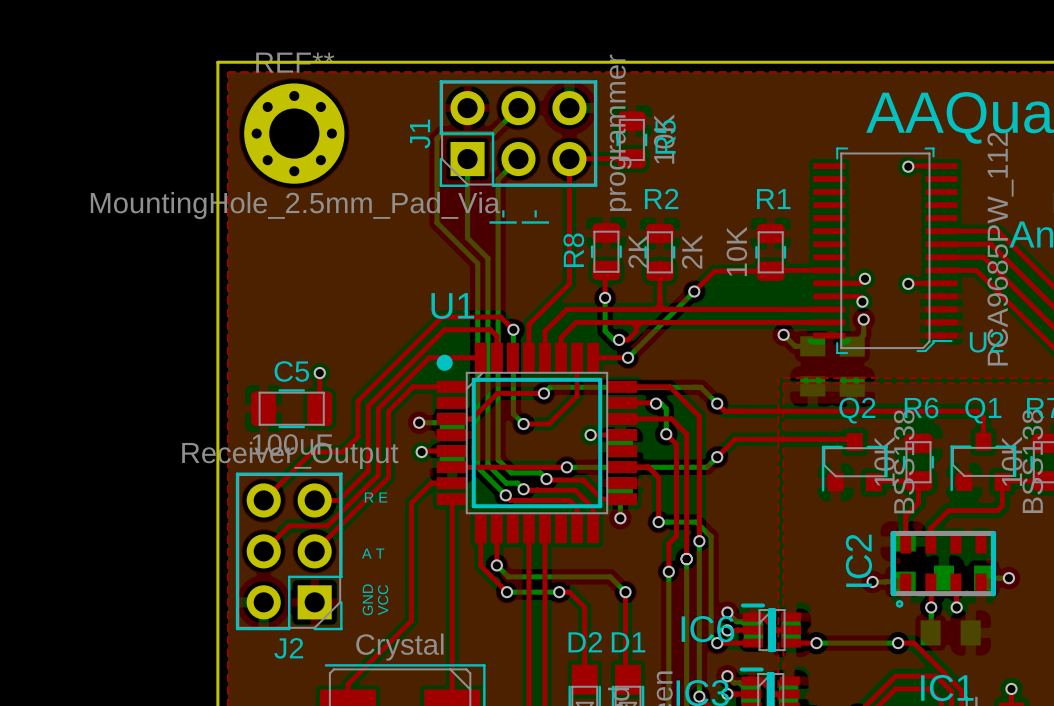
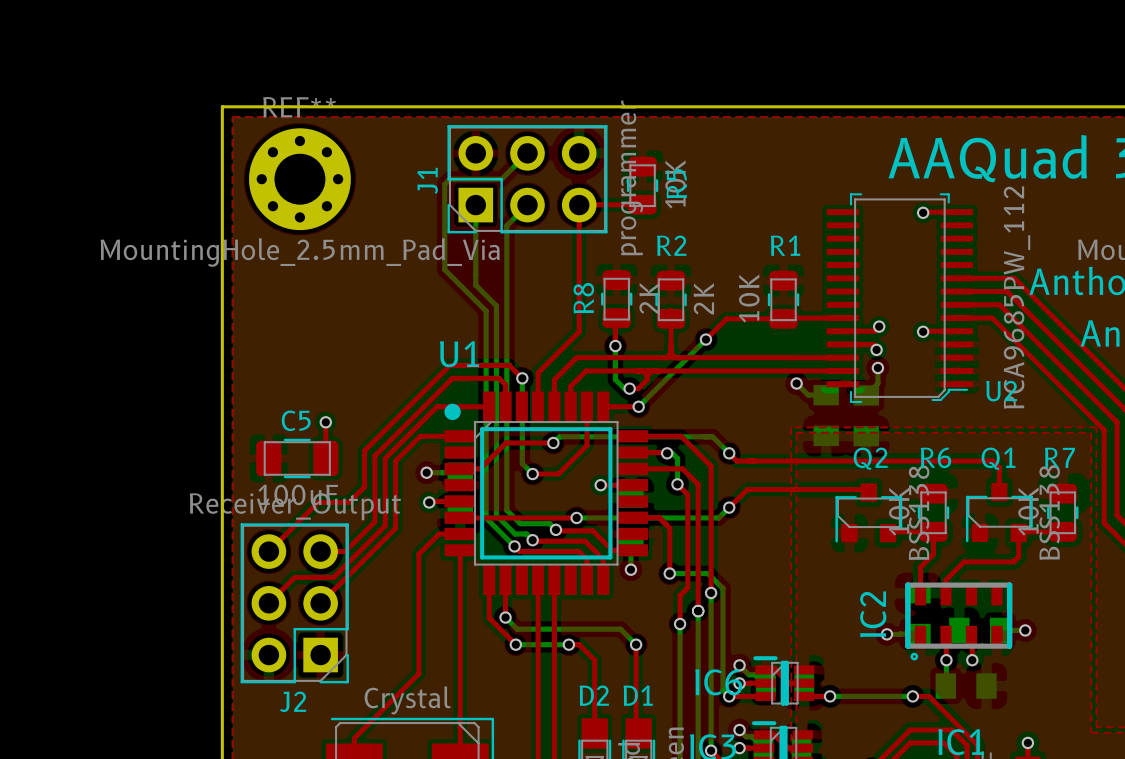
text: -| (503, 216) -> none
text: -| (535, 216) -> none
text: R E (376, 497) -> none
text: A T (373, 553) -> none
text: GND (367, 599) -> none
text: VCC (383, 600) -> none

